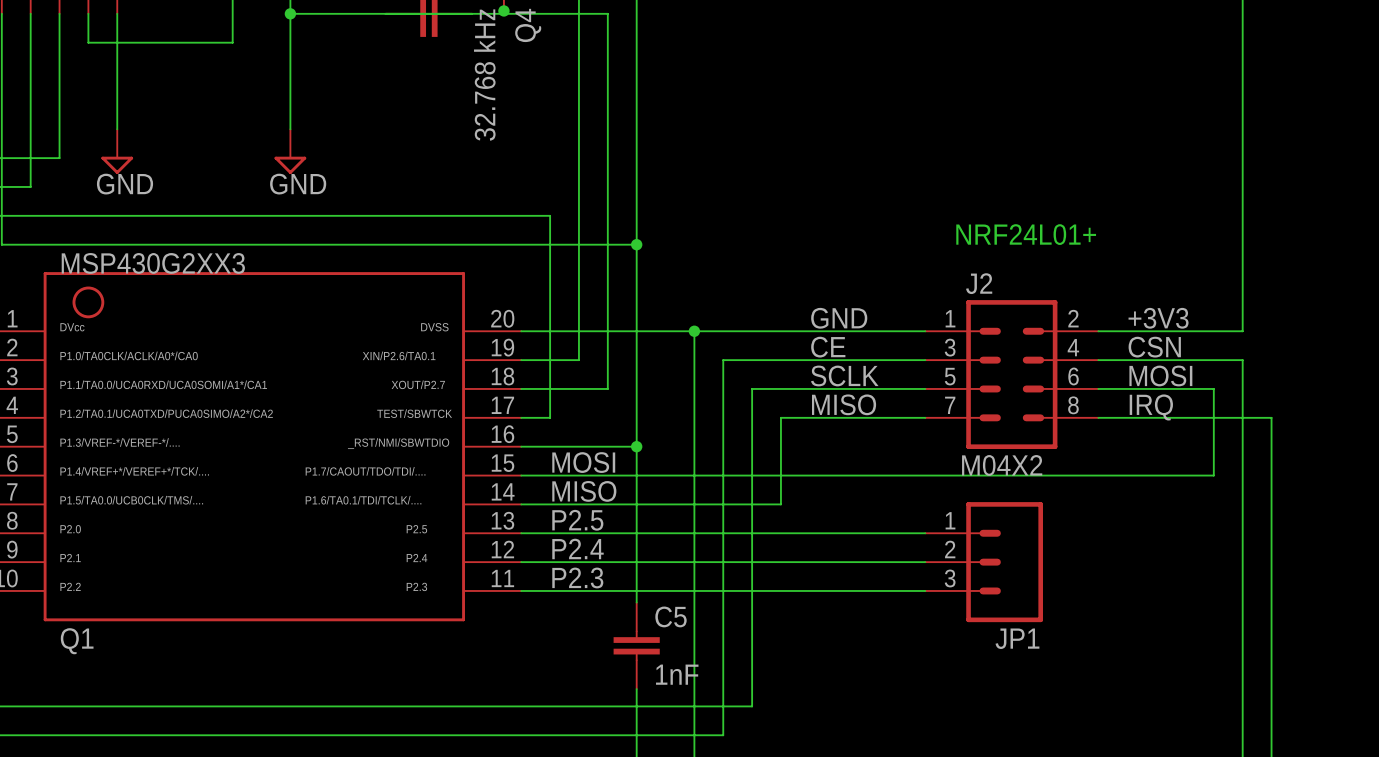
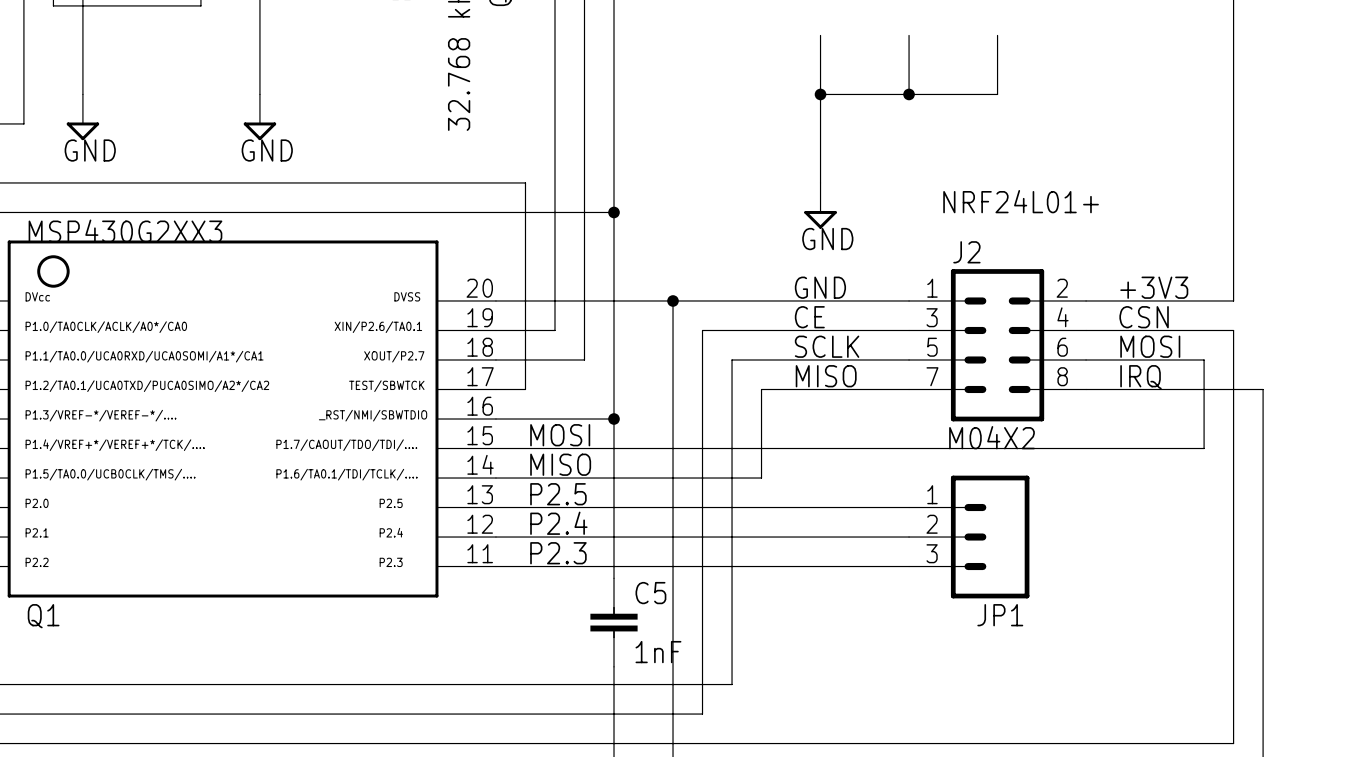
wire: none -> (820, 35) (820, 182)
wire: none -> (909, 35) (909, 94)
wire: none -> (997, 35) (997, 94) (820, 94)
junction: none -> (820, 94)
junction: none -> (909, 94)
power symbol: none -> GND (820, 205)

